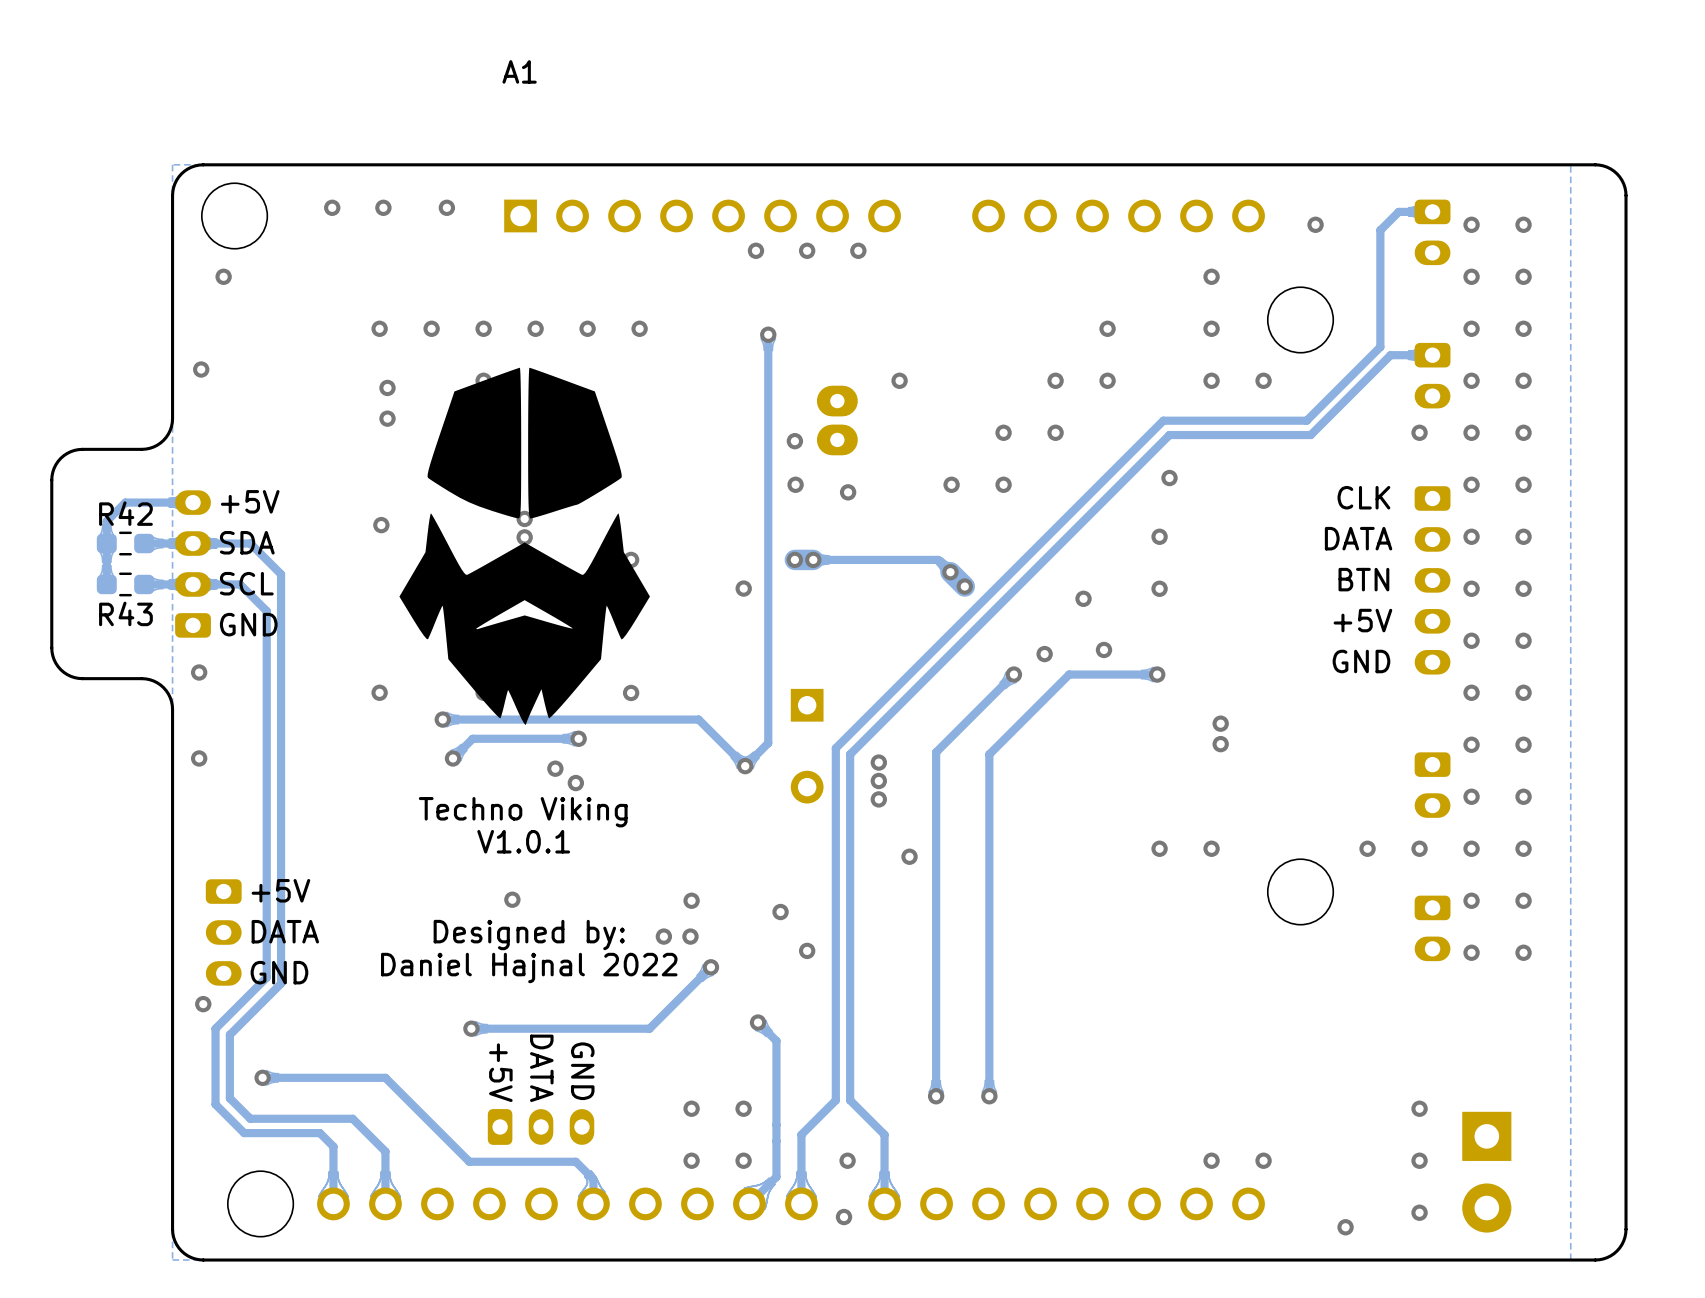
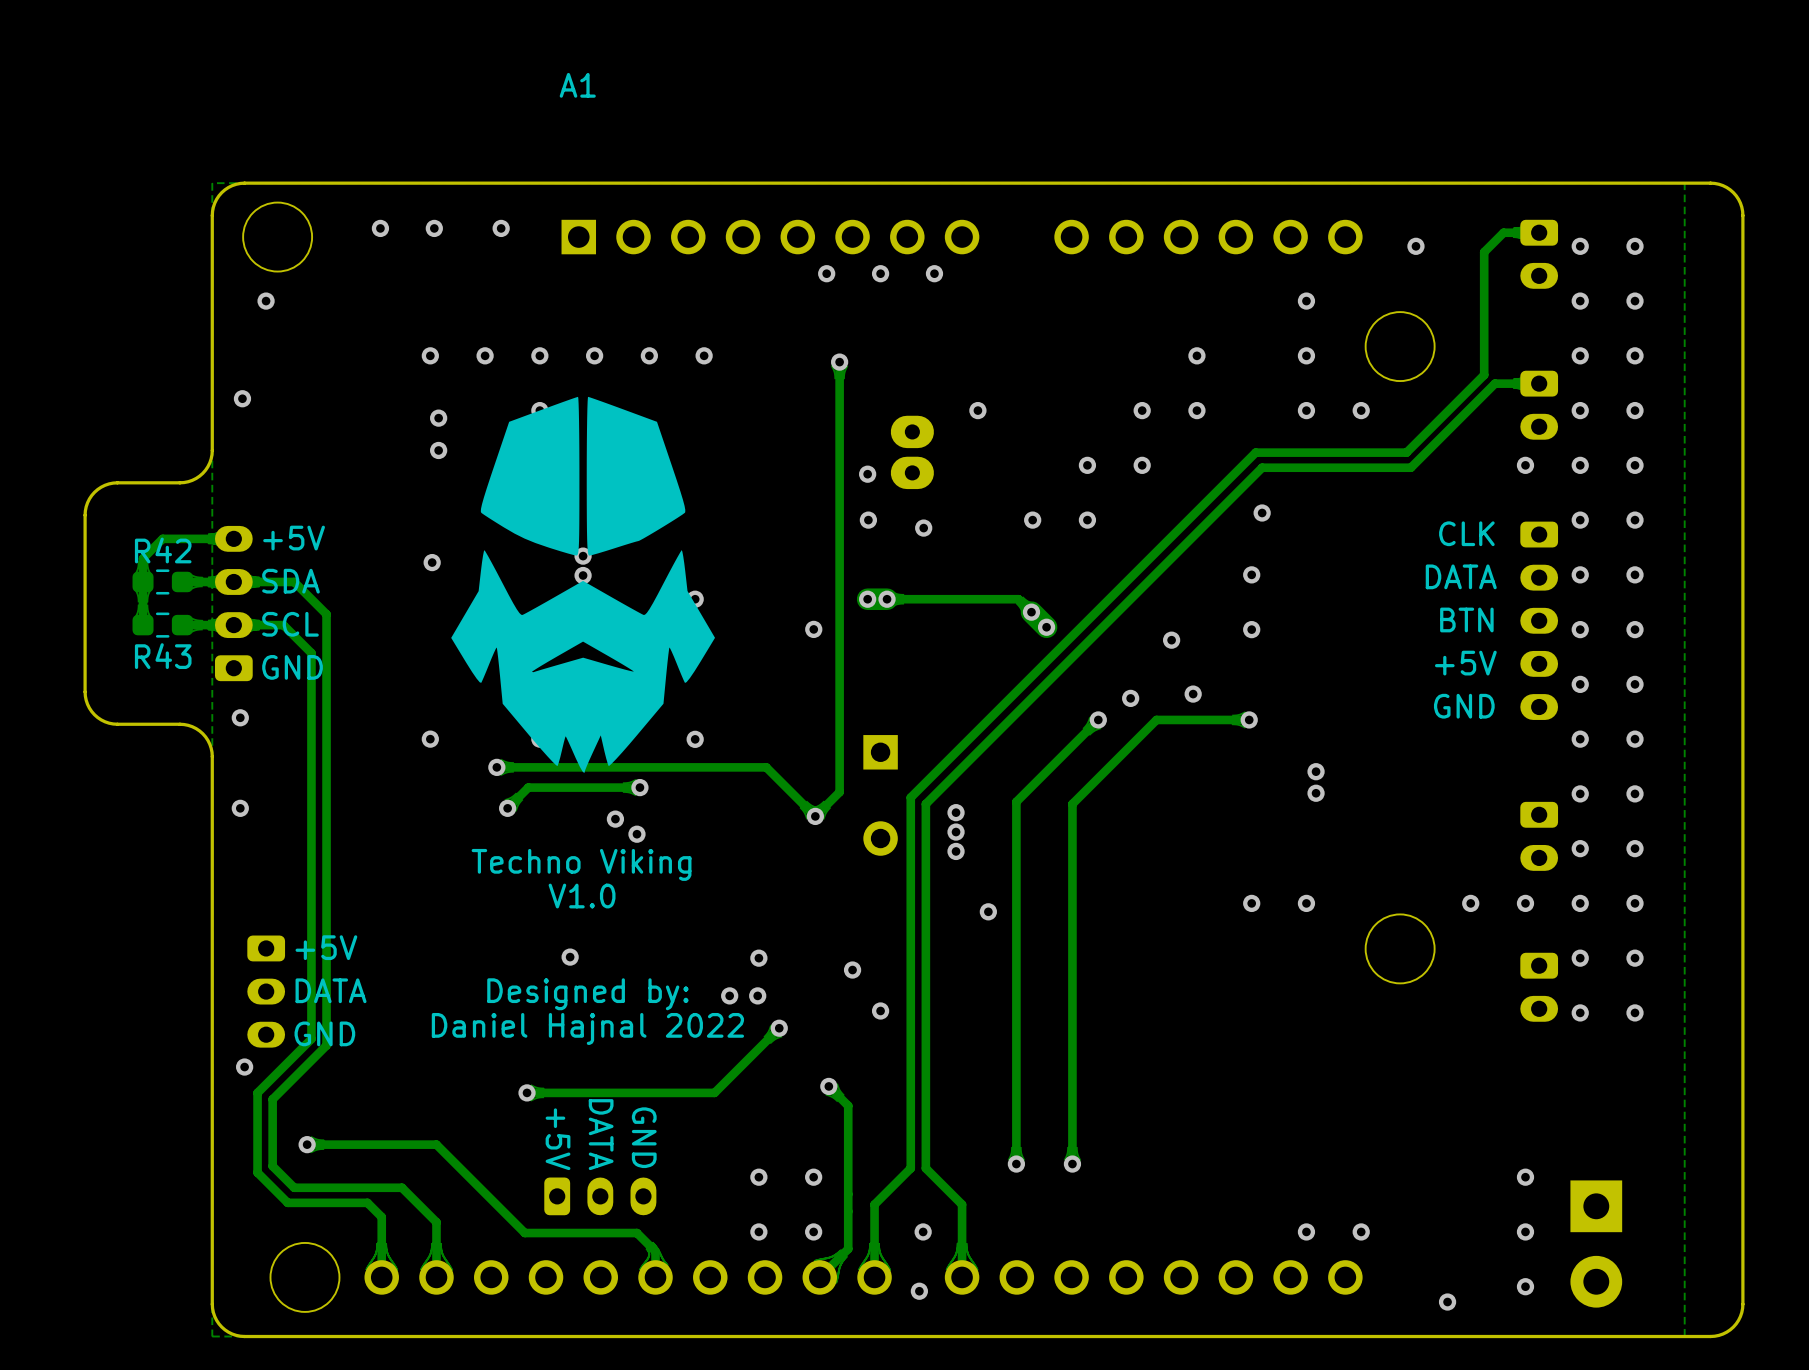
text: V1.0.1 (523, 841) -> V1.0 (582, 896)

